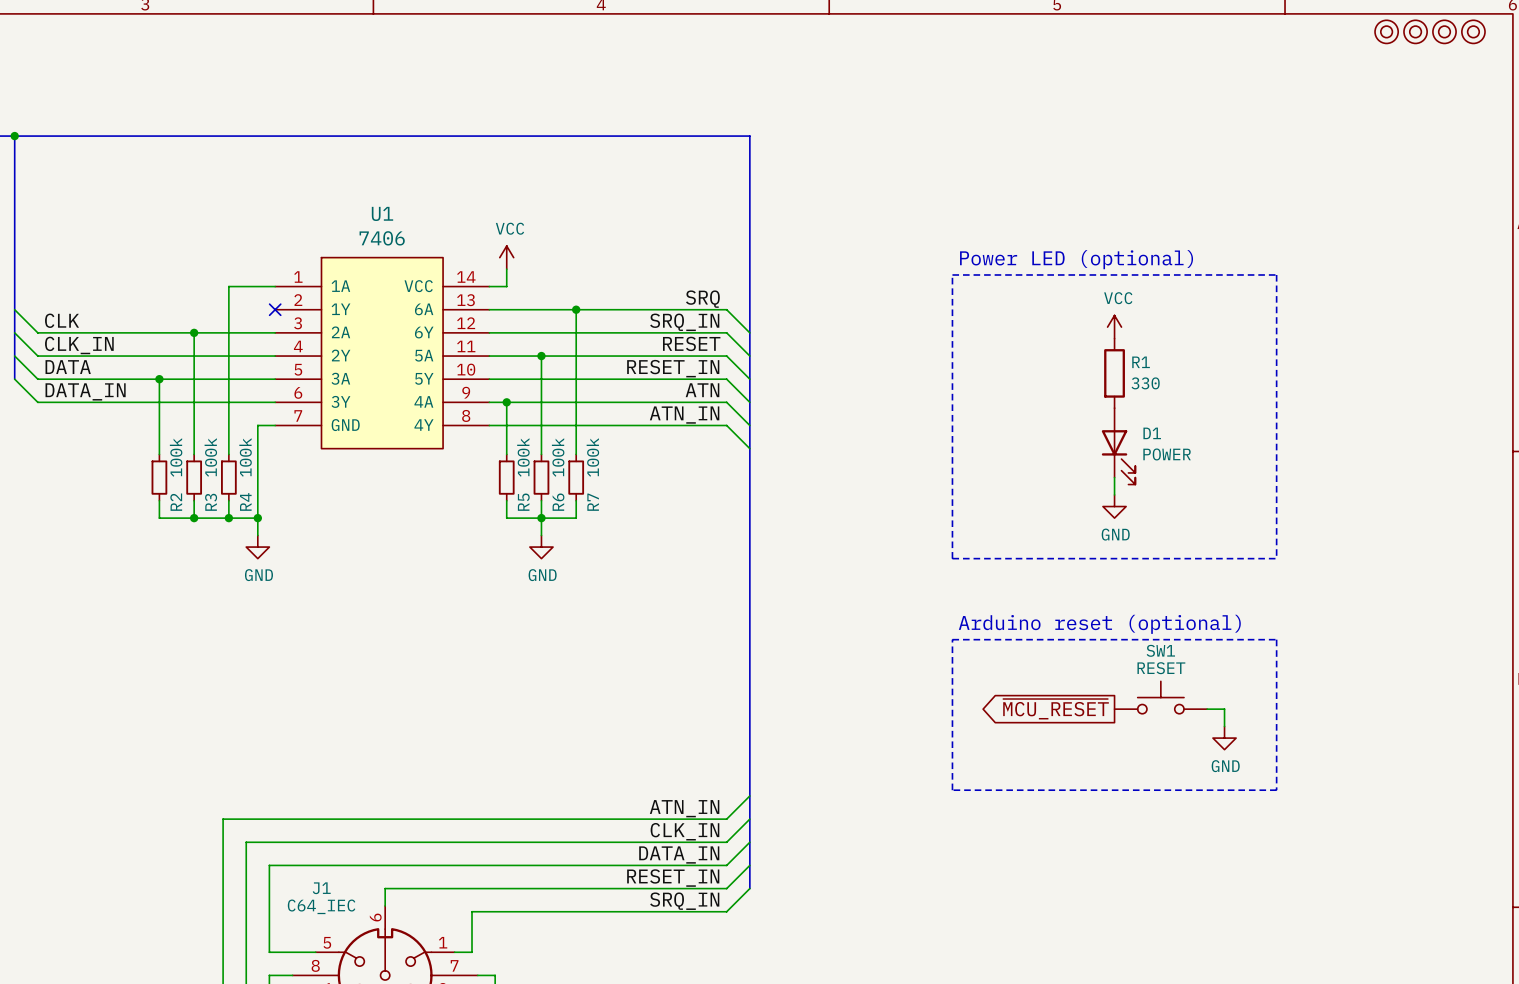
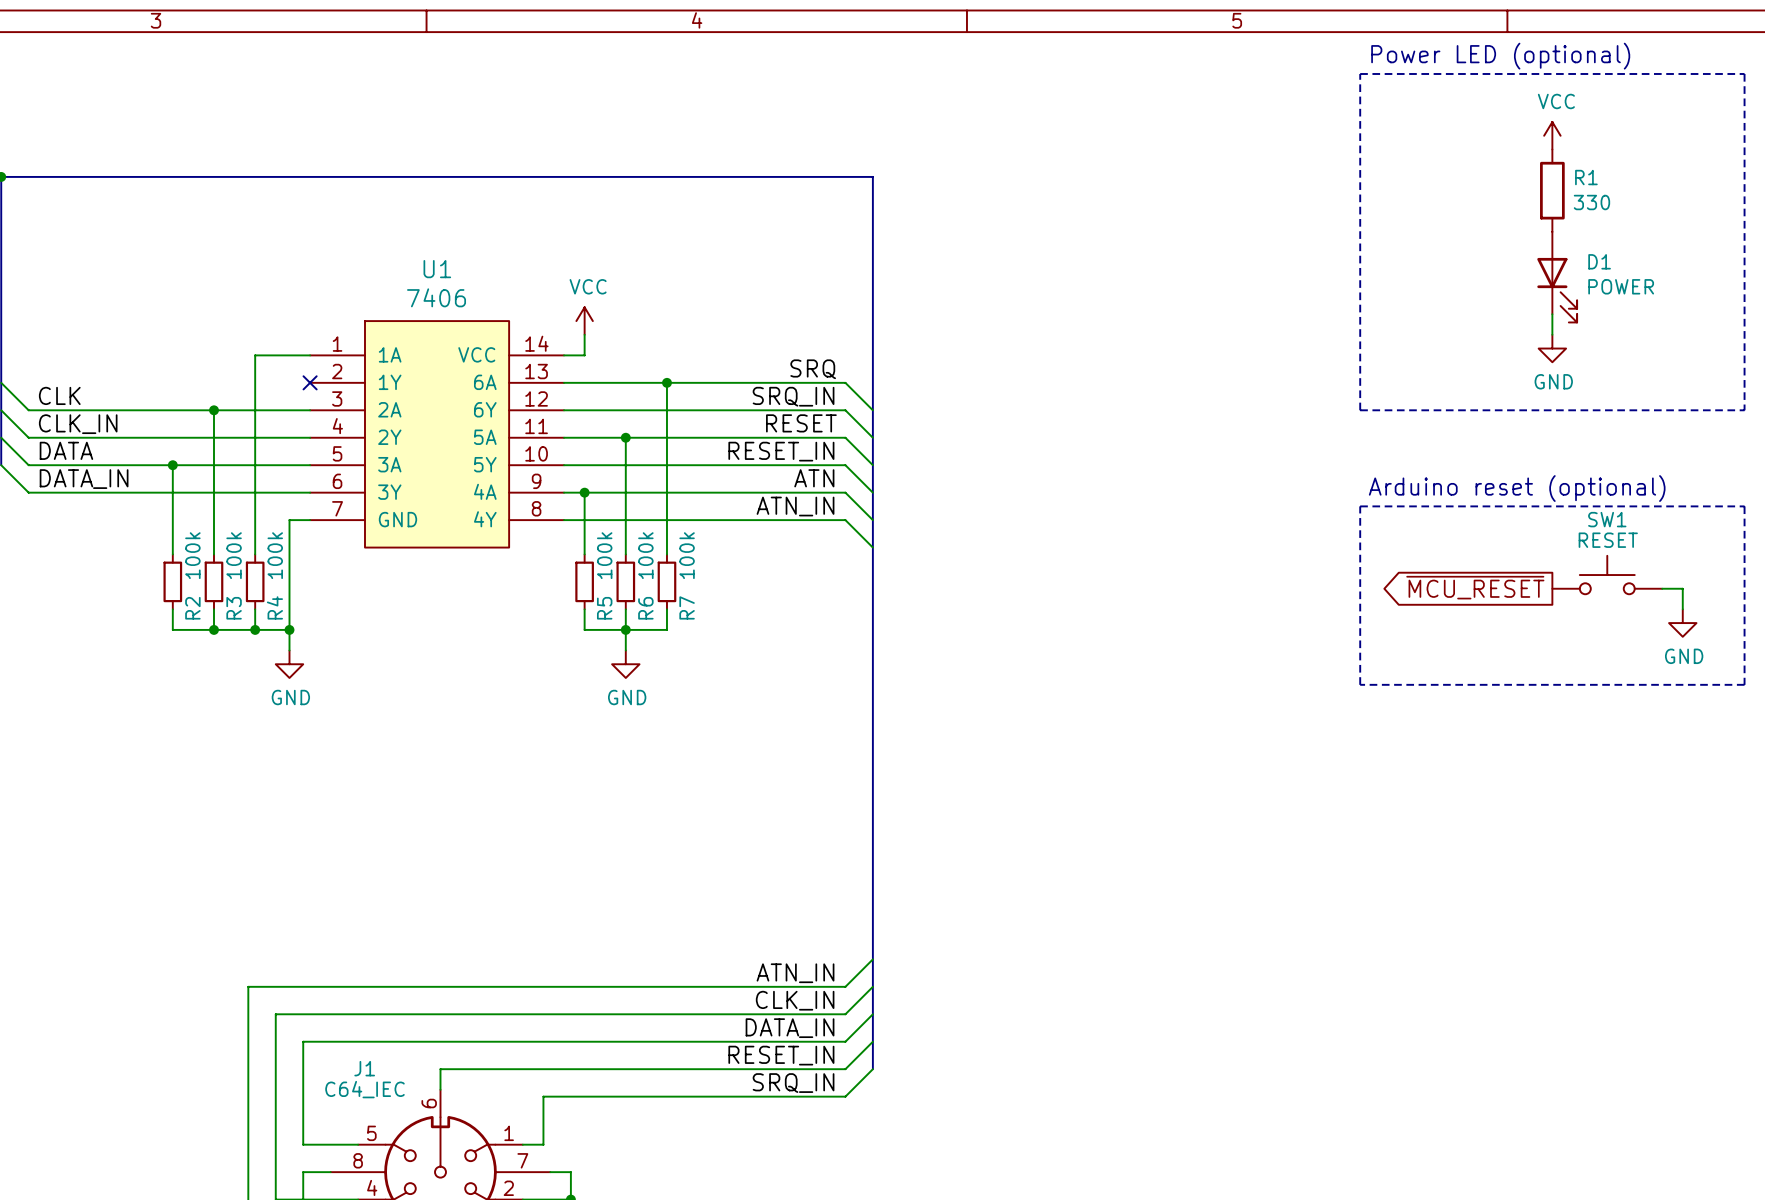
part: (1386, 31) -> none
part: (1415, 31) -> none
part: (1444, 31) -> none
part: (1473, 31) -> none
text: none -> Power LED (optional) (1500, 56)
line: none -> (1360, 73) (1360, 410) (1744, 410) (1744, 73) (1360, 73)
power symbol: none -> VCC (1552, 135)
wire: none -> (1552, 314) (1552, 334)
text: Power LED (optional) (1076, 259) -> none
line: (952, 274) (952, 558) (1276, 558) (1276, 274) (952, 274) -> none
power symbol: none -> GND (1552, 348)
power symbol: VCC (1114, 327) -> none
R1 position: (1114, 373) -> (1552, 190)
text: none -> Arduino reset (optional) (1517, 488)
line: none -> (1360, 506) (1360, 684) (1744, 684) (1744, 506) (1360, 506)
D1 position: (1118, 446) -> (1557, 277)
wire: (1114, 477) (1114, 494) -> none
global label: none -> ~{MCU_RESET} (1475, 587)
wire: none -> (1662, 588) (1682, 588) (1682, 609)
power symbol: GND (1114, 506) -> none
power symbol: none -> GND (1682, 623)
text: Arduino reset (optional) (1099, 624) -> none
line: (952, 639) (952, 790) (1276, 790) (1276, 639) (952, 639) -> none
SW1 position: (1160, 697) -> (1607, 575)
global label: ~{MCU_RESET} (1056, 709) -> none
wire: (1207, 709) (1224, 709) (1224, 726) -> none
power symbol: GND (1224, 738) -> none

